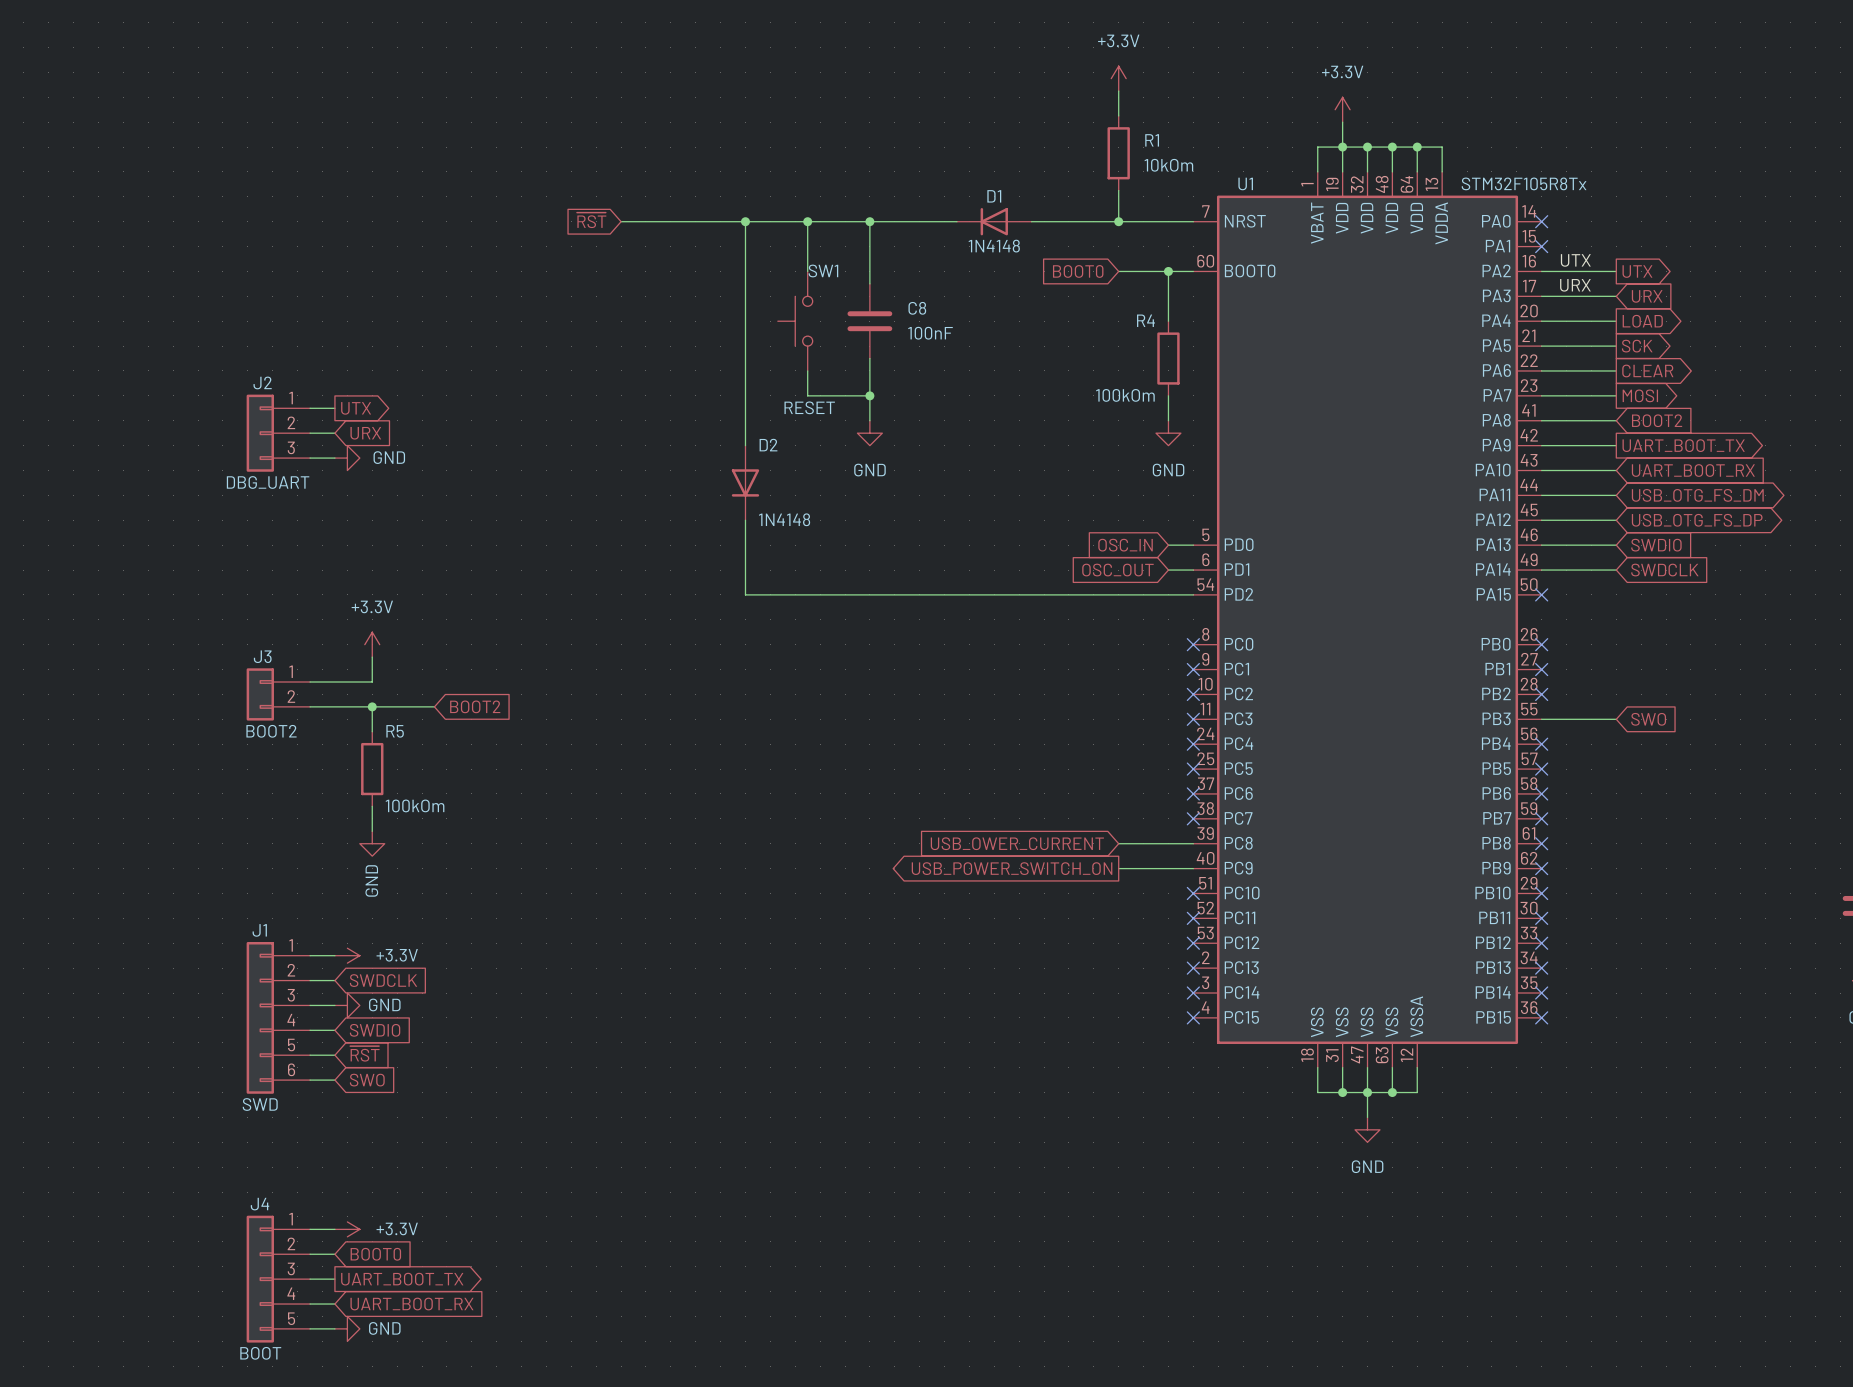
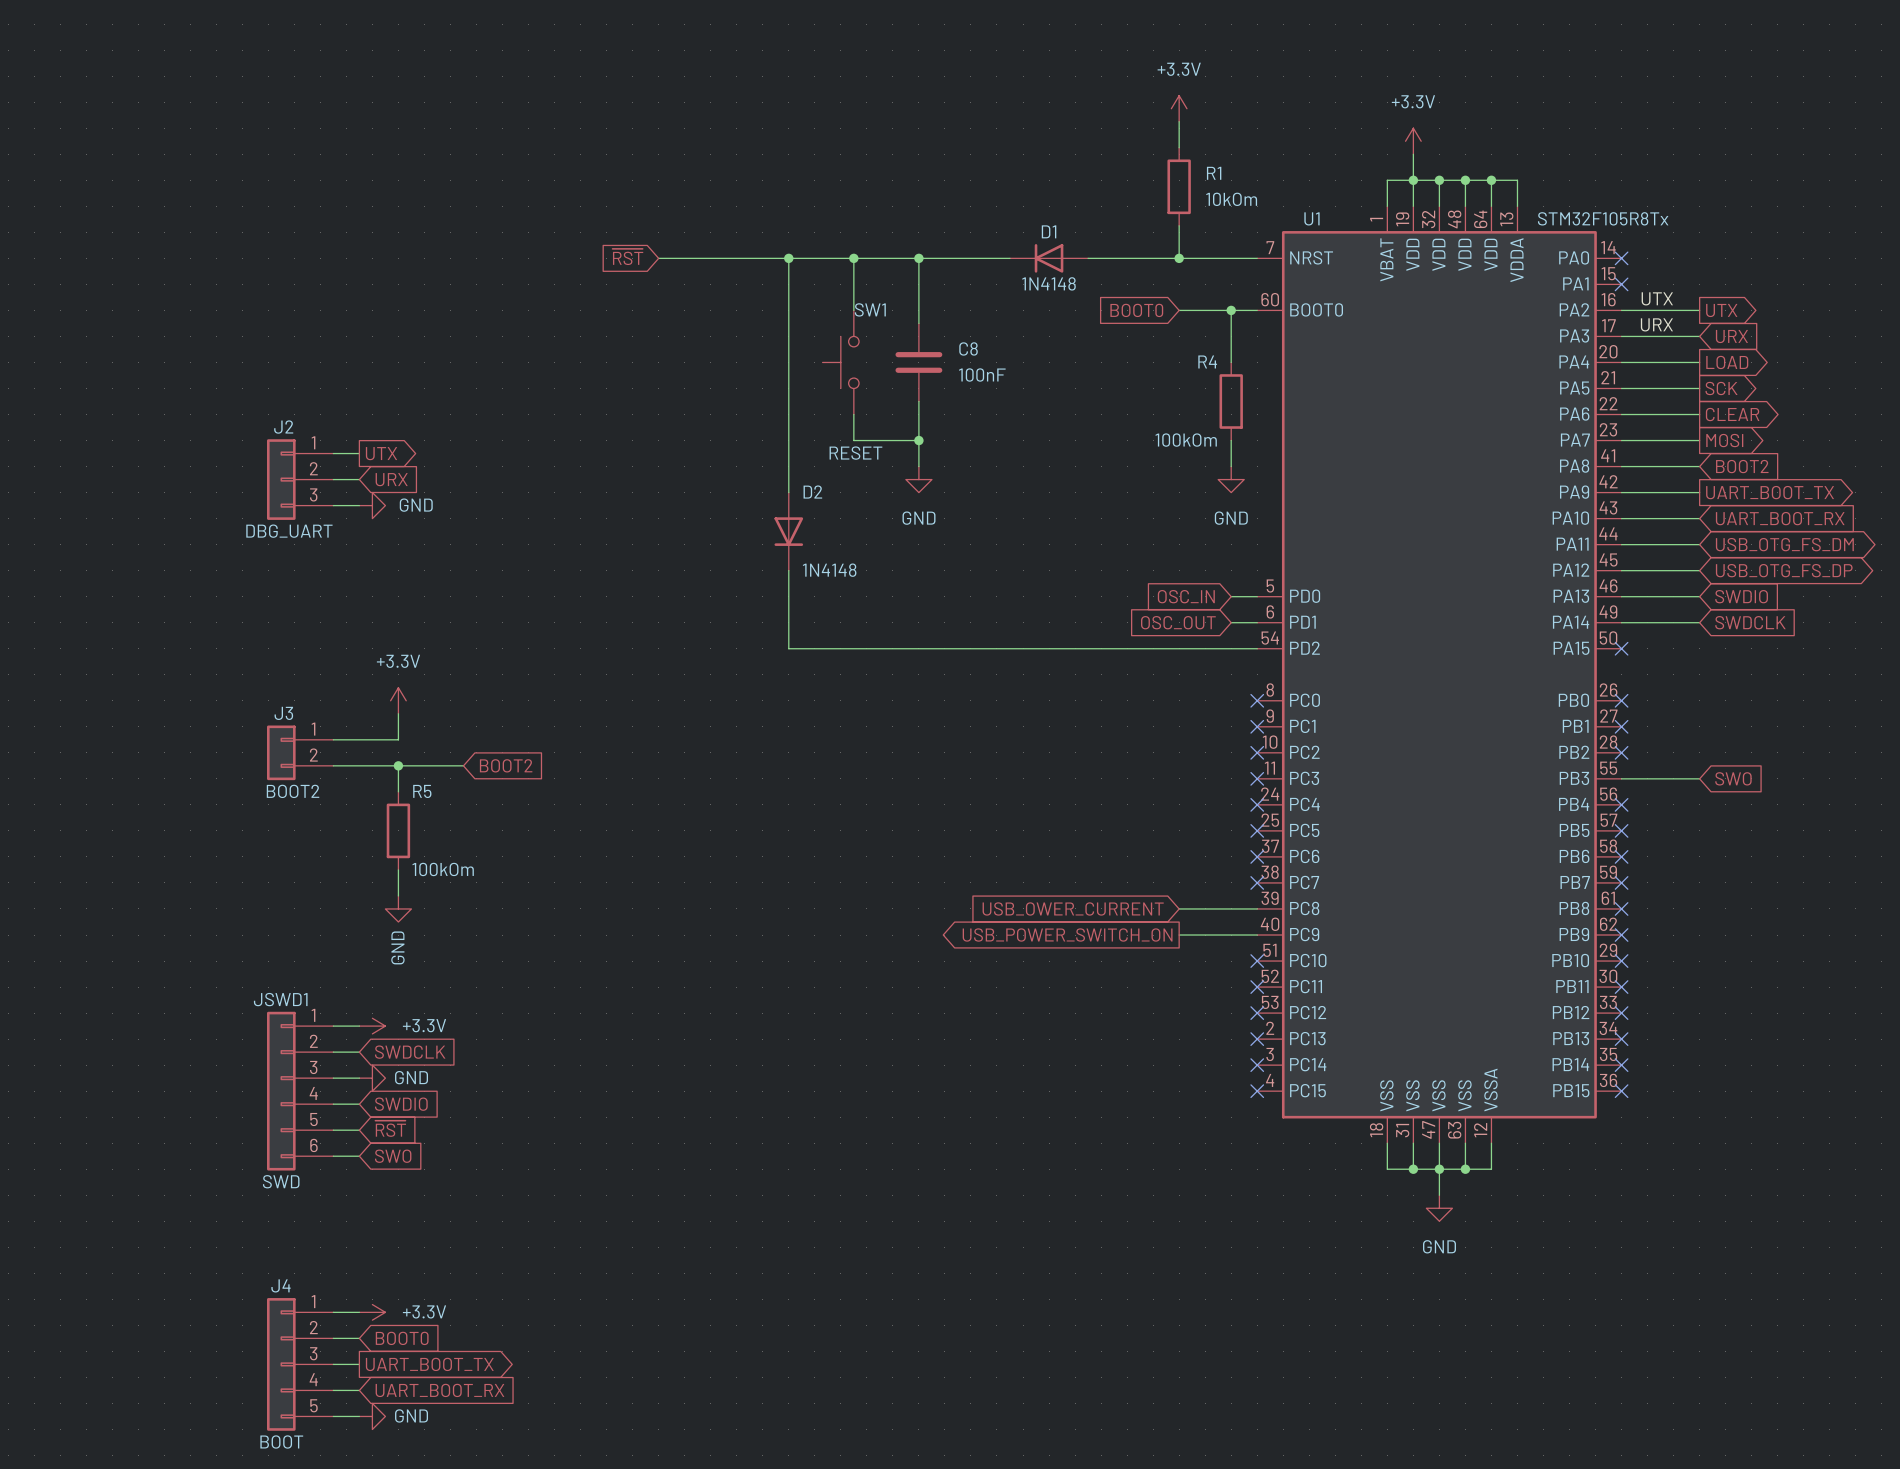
J1 name: J1 (259, 930) -> JSWD1 (280, 999)

